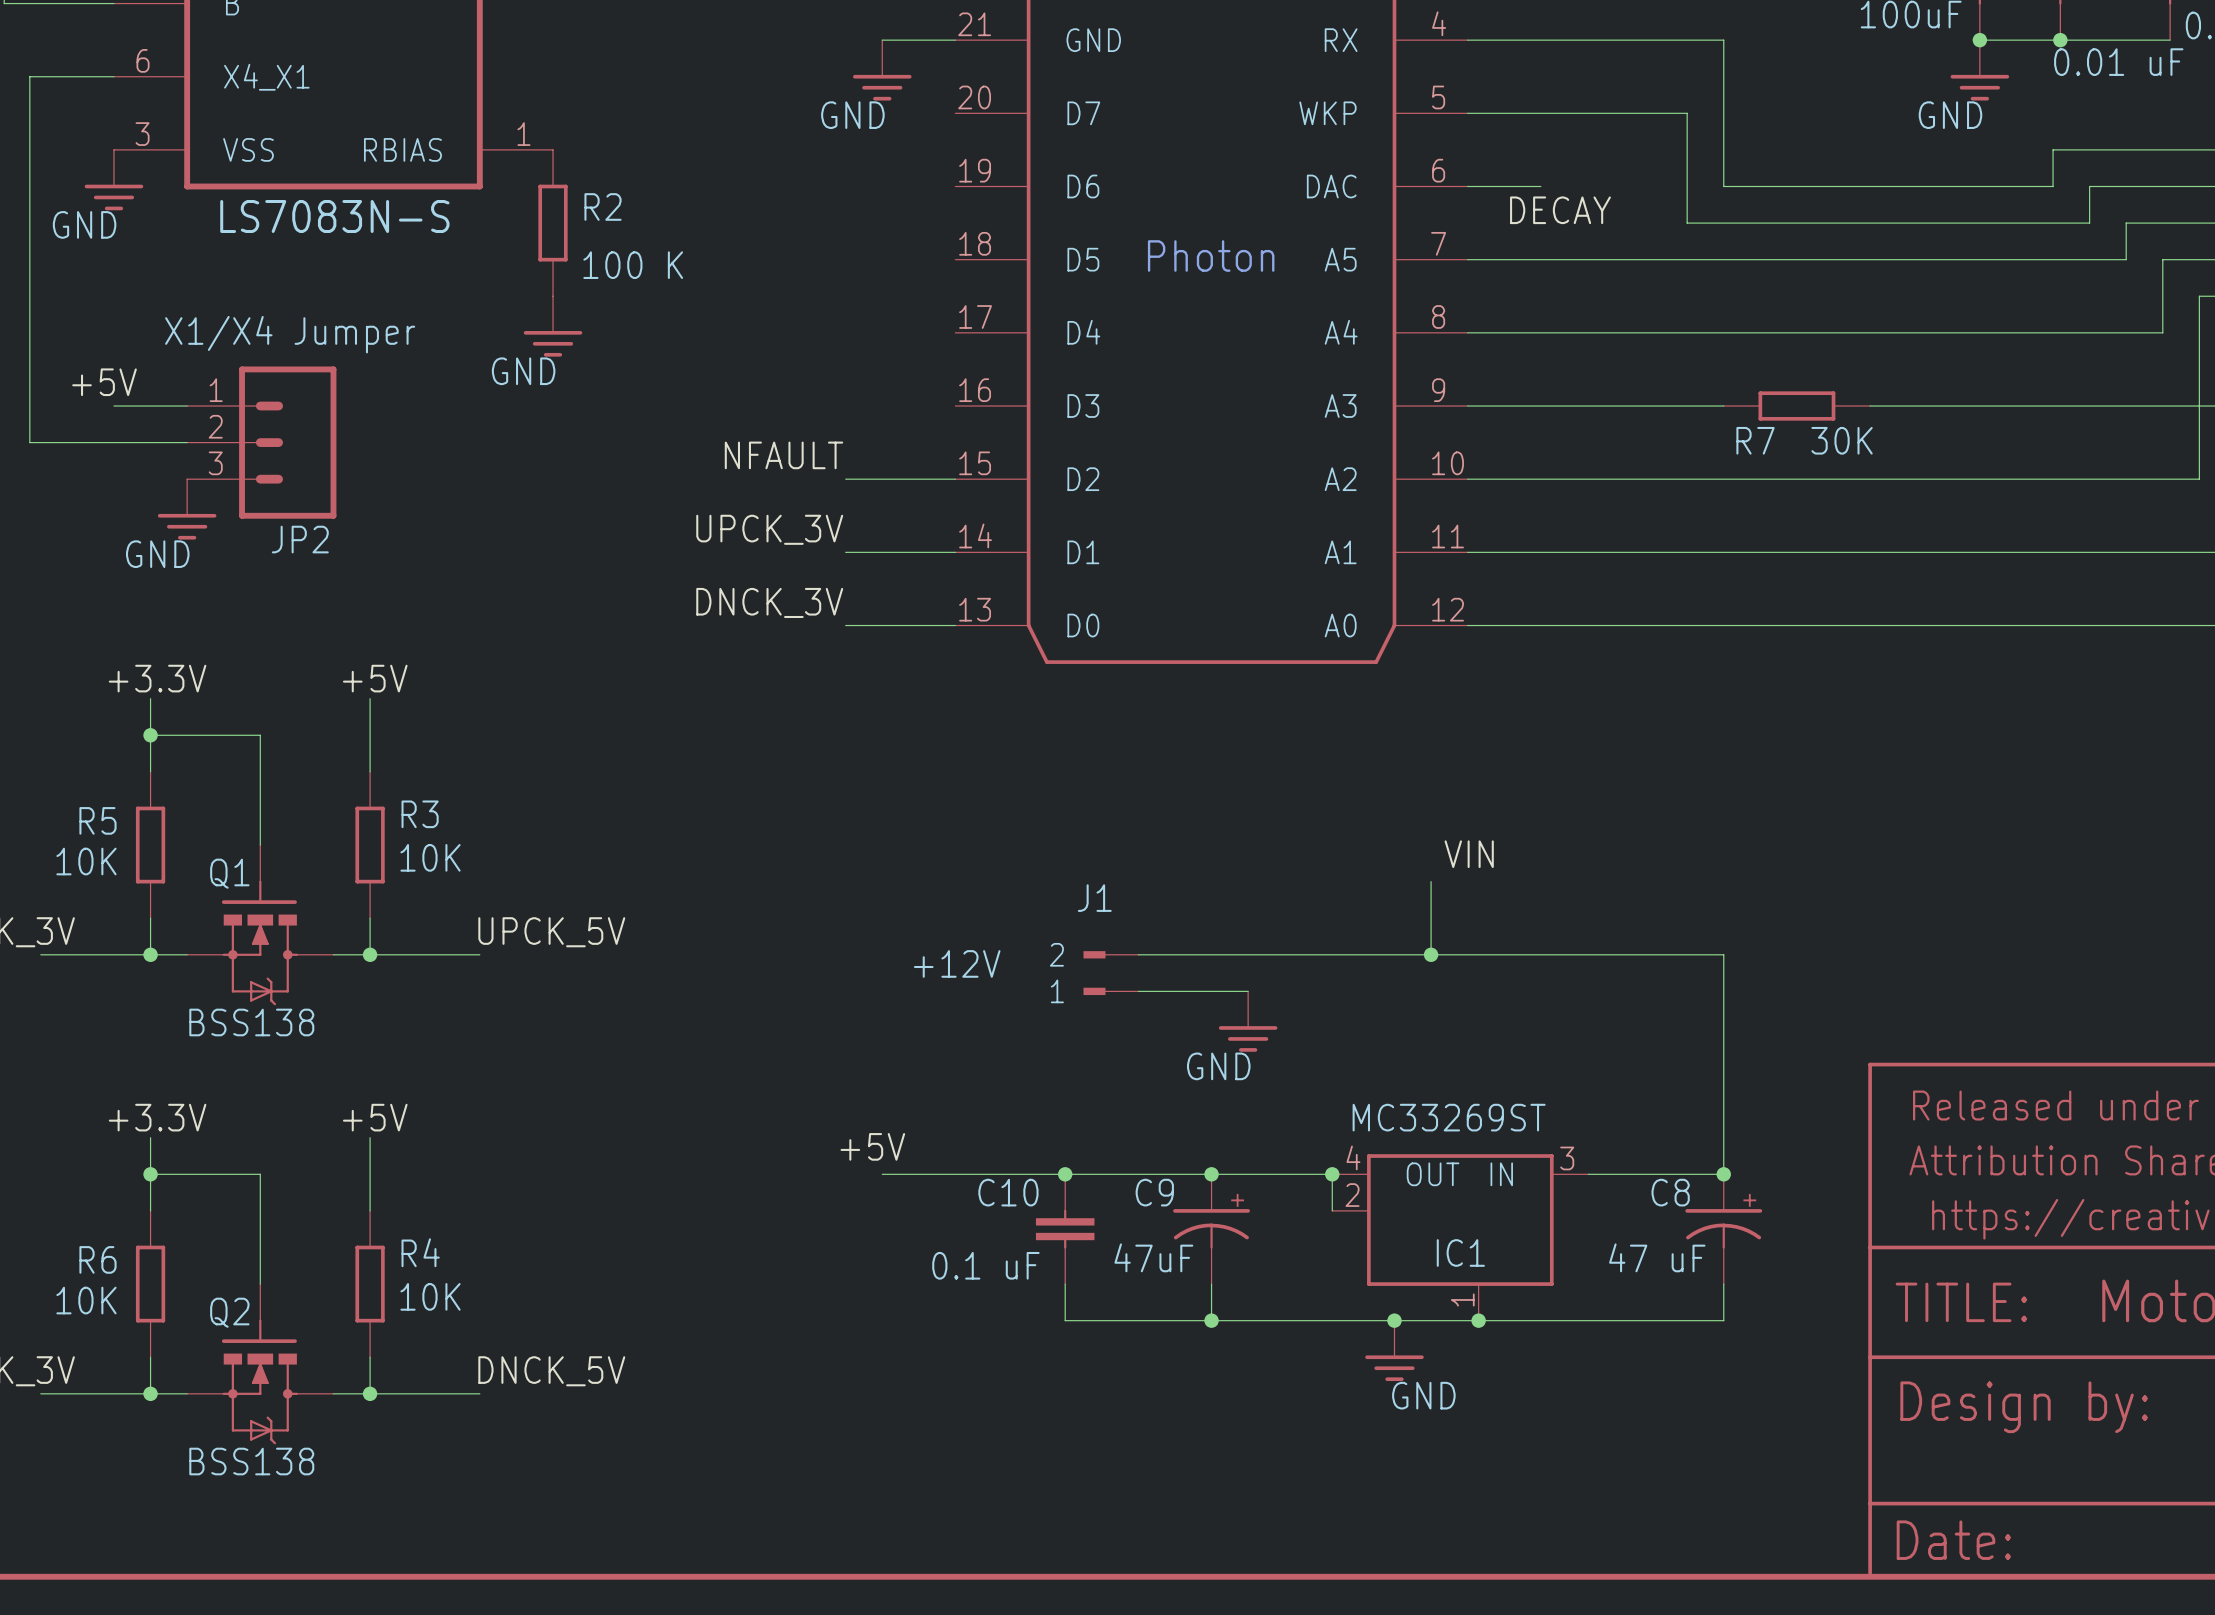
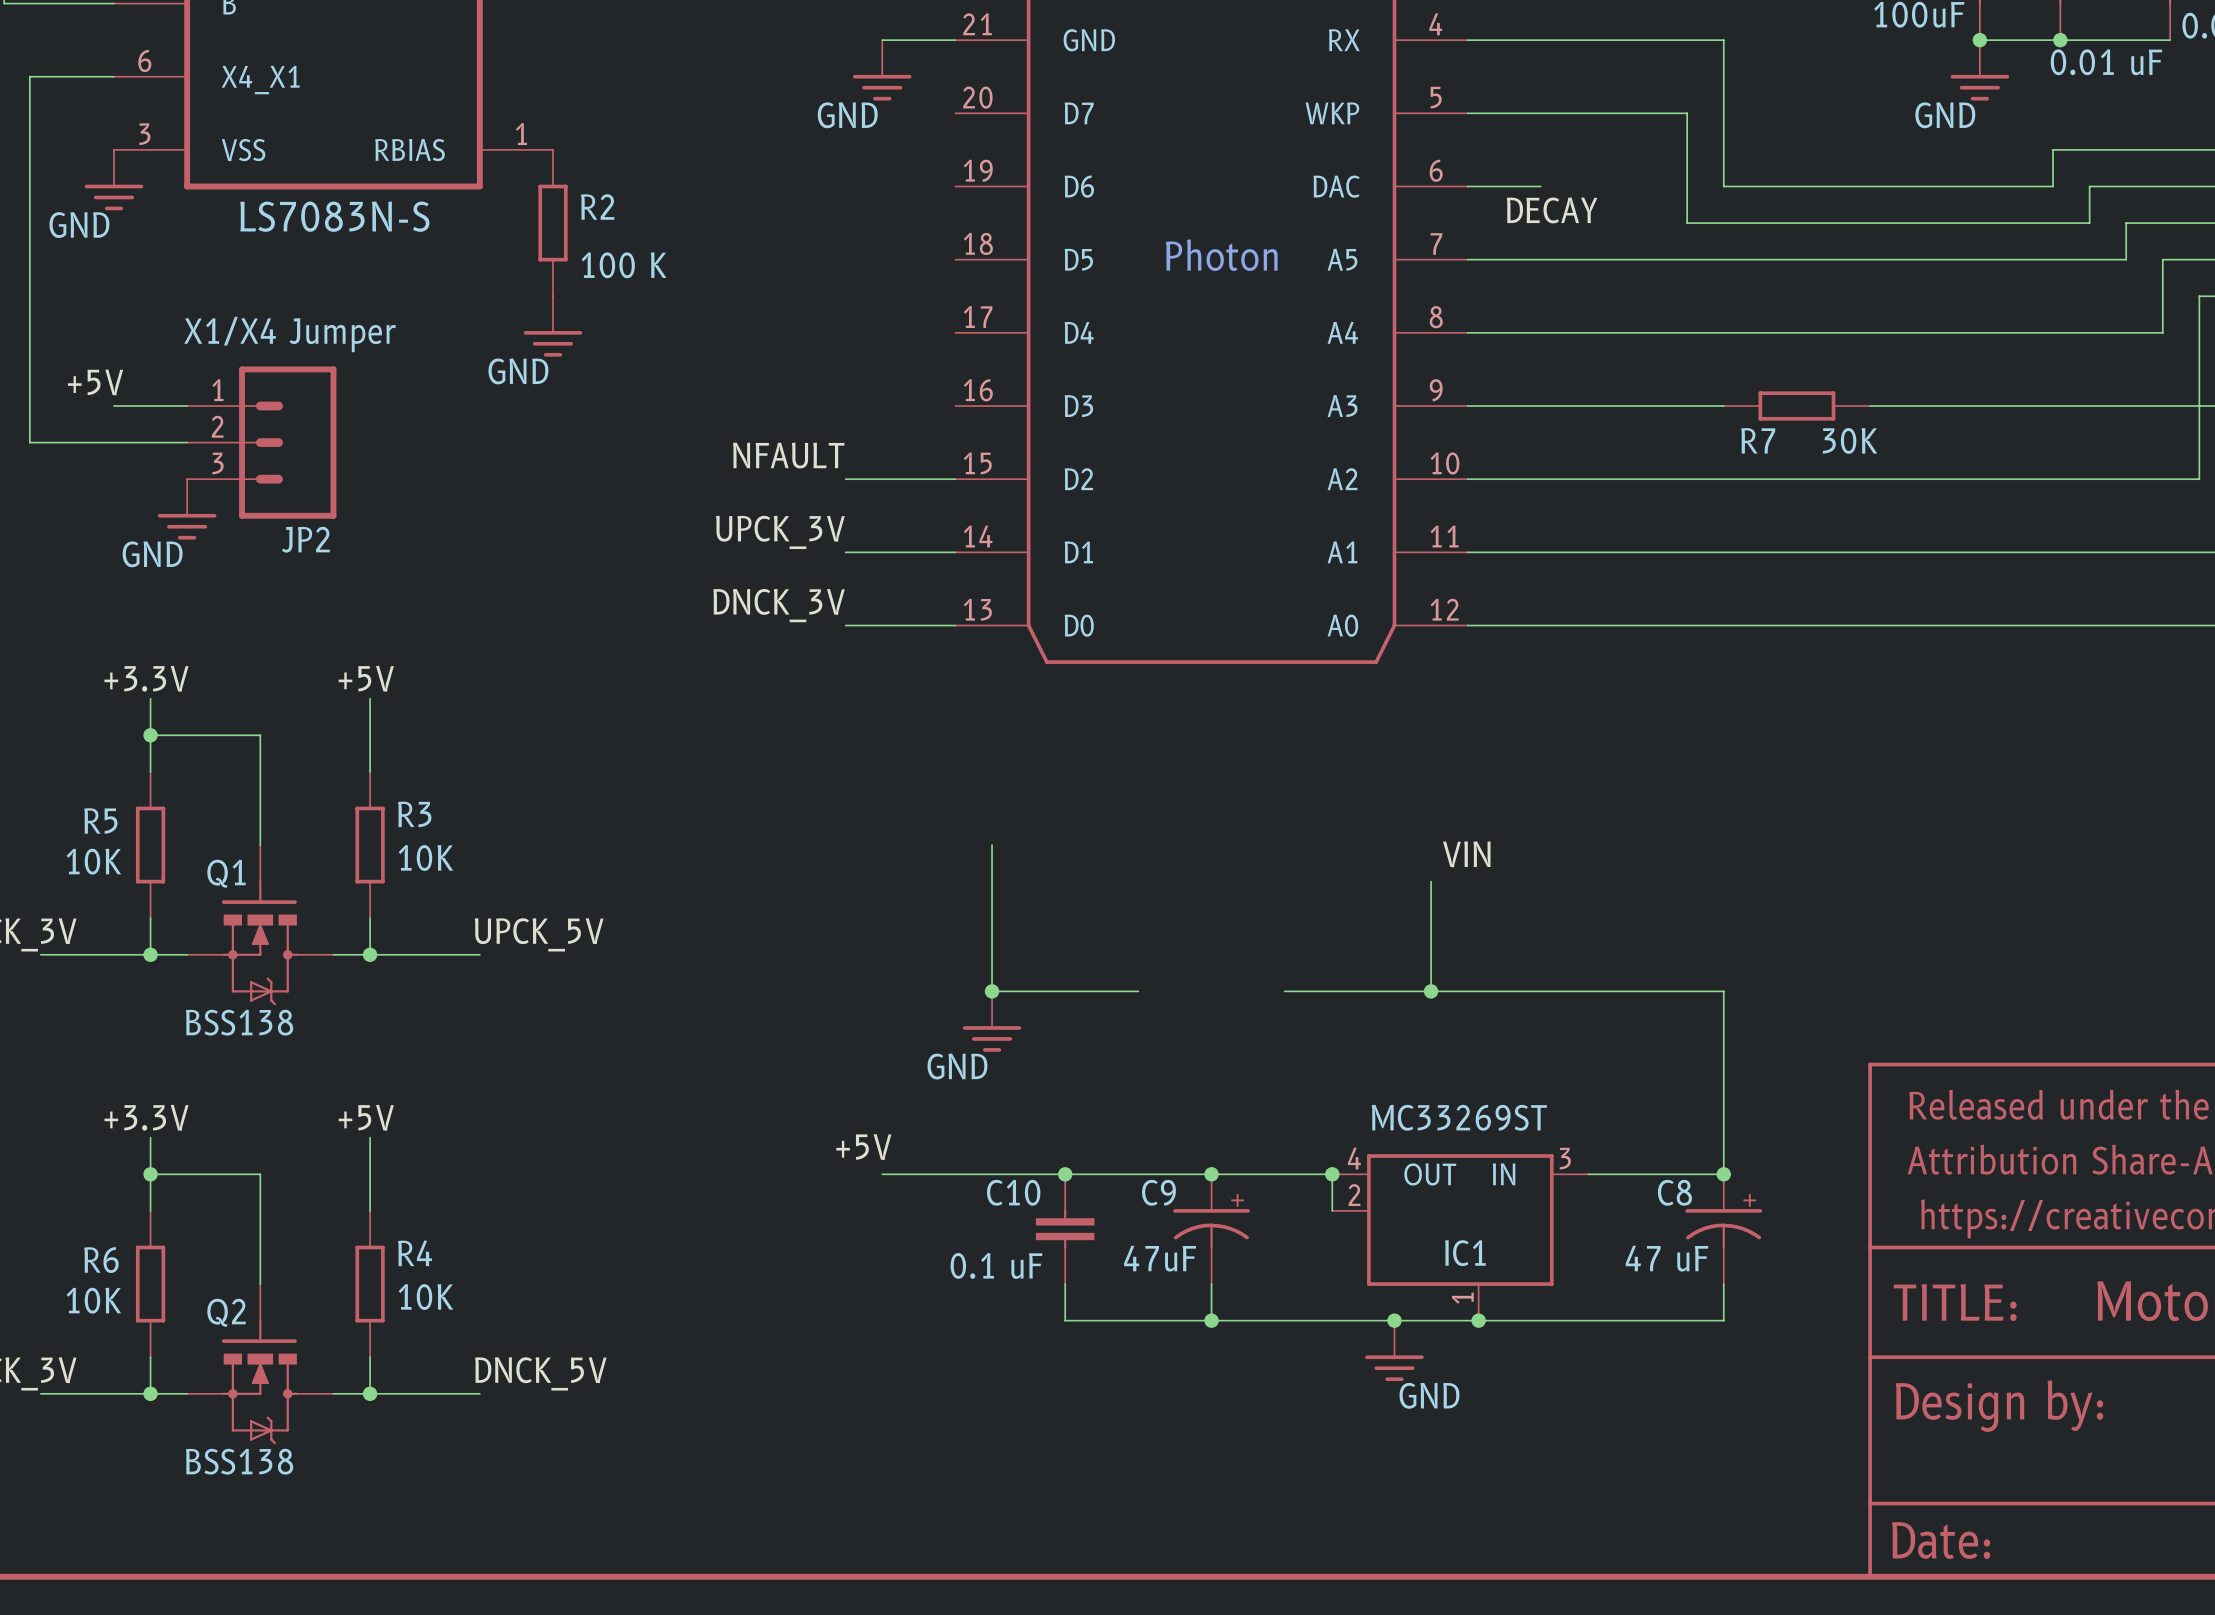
wire: (1138, 954) (1723, 954) (1723, 991) -> (1284, 991) (1723, 991)
wire: none -> (1431, 954) (1431, 991)
junction position: (1431, 954) -> (1431, 991)
J1: +12V (1110, 973) -> none
junction: none -> (992, 991)
wire: (1138, 991) (1248, 991) -> (1138, 991) (992, 991) (992, 845)
power symbol position: GND (1248, 1021) -> GND (992, 1021)

